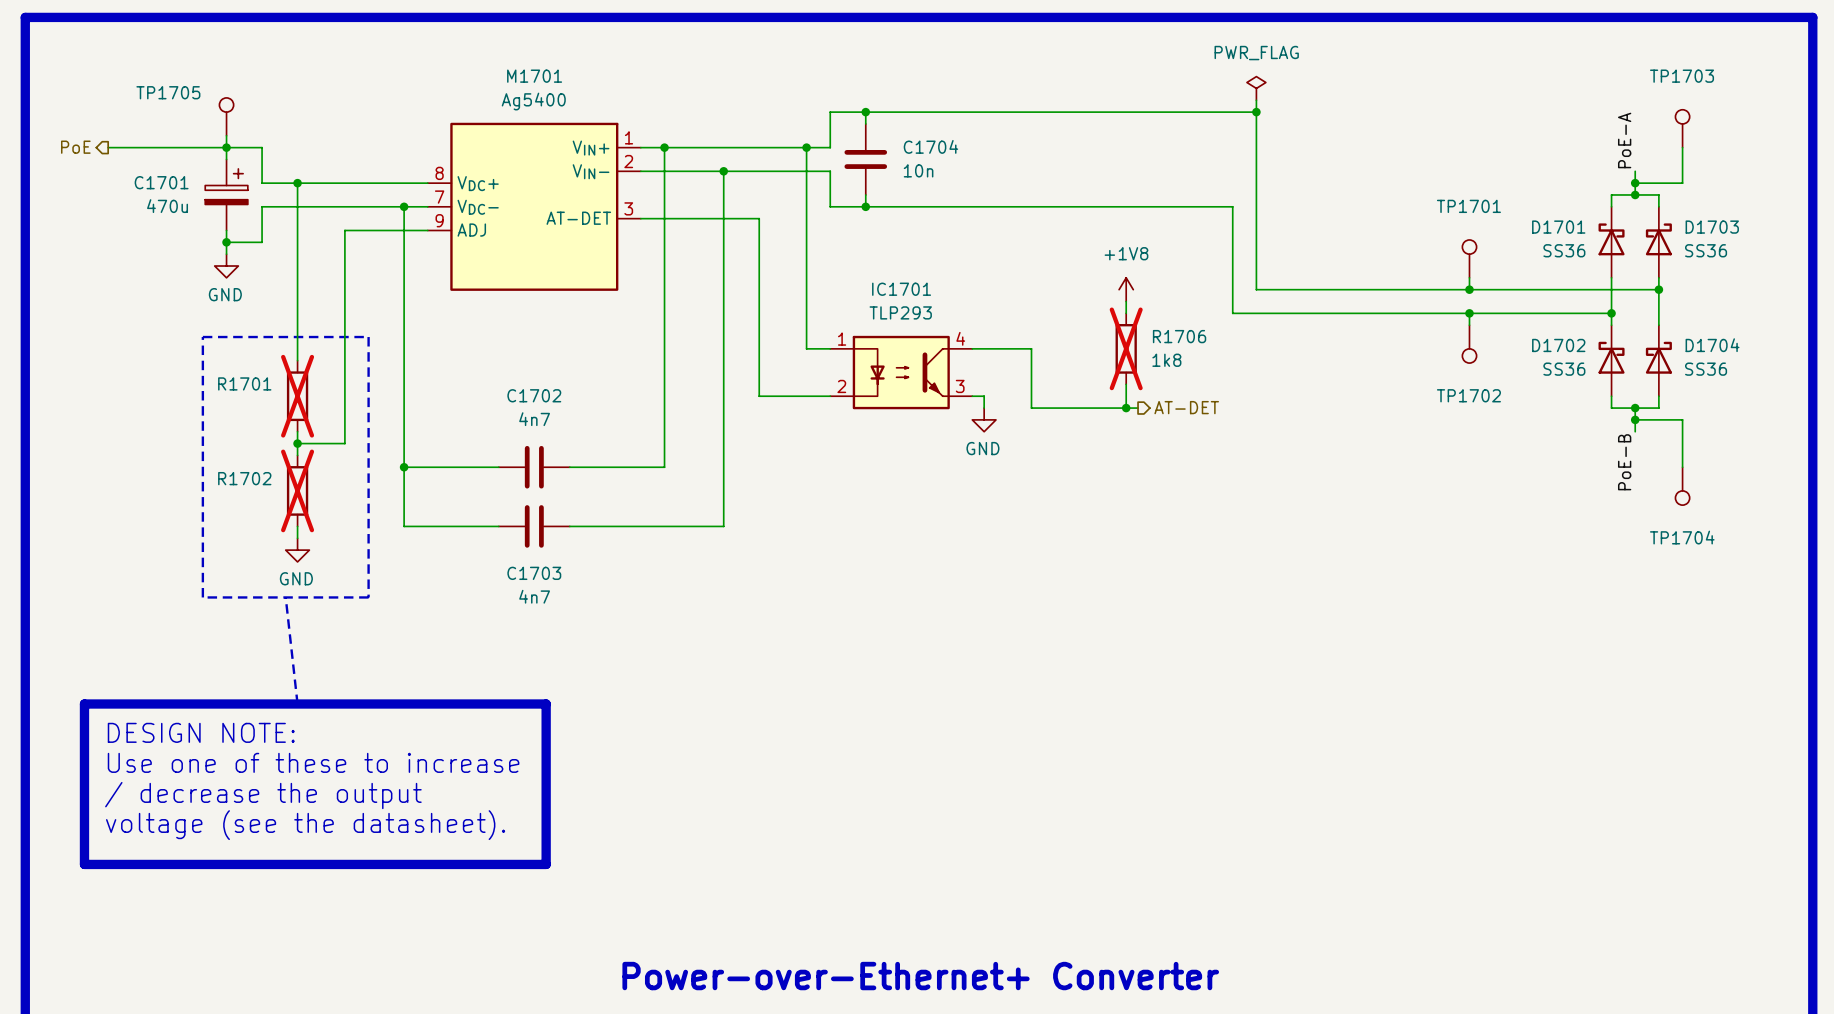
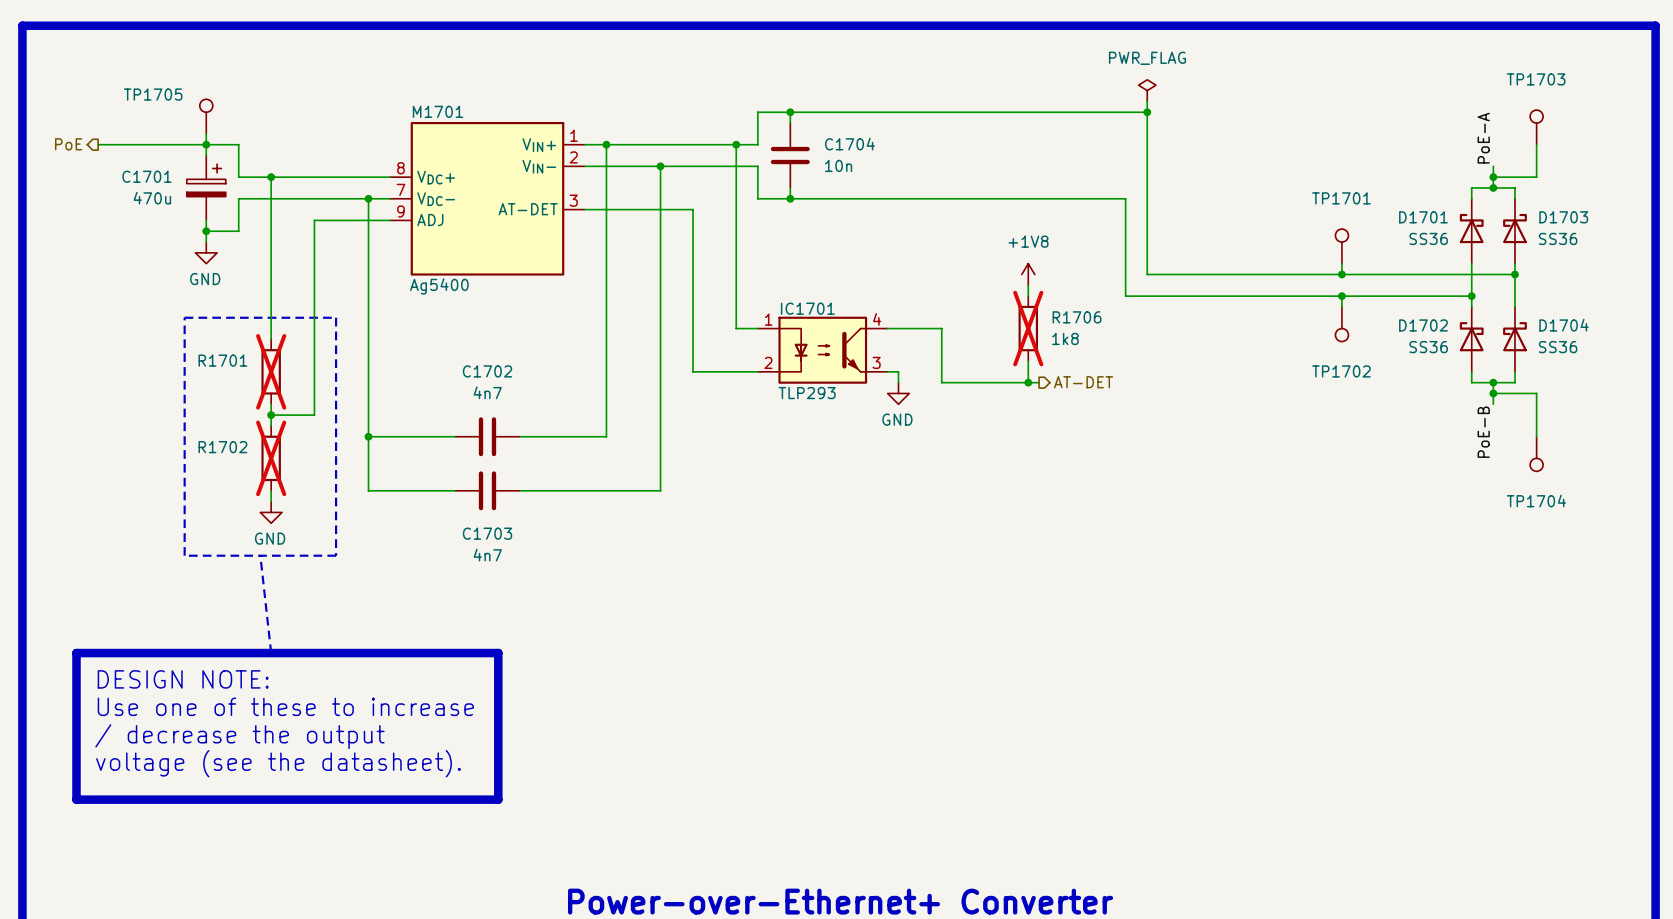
M1701 name position: M1701 (534, 76) -> M1701 (437, 111)
M1701 value position: Ag5400 (533, 101) -> Ag5400 (439, 286)
IC1701 name position: IC1701 (901, 289) -> IC1701 (807, 308)
IC1701 value position: TLP293 (900, 312) -> TLP293 (807, 393)

